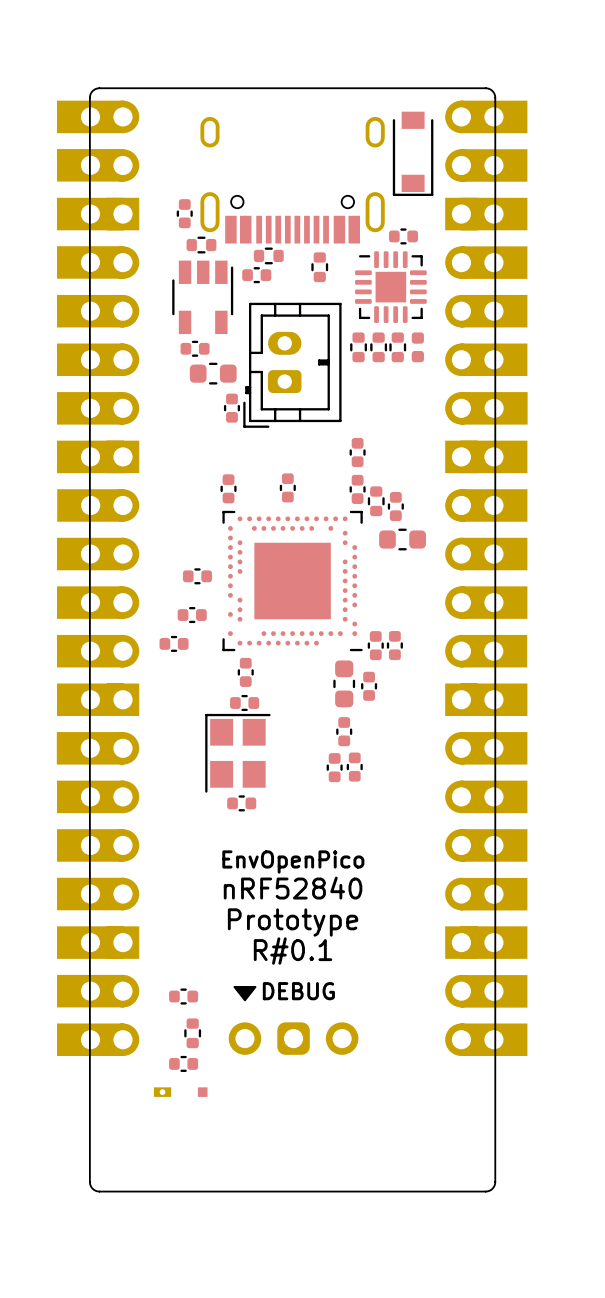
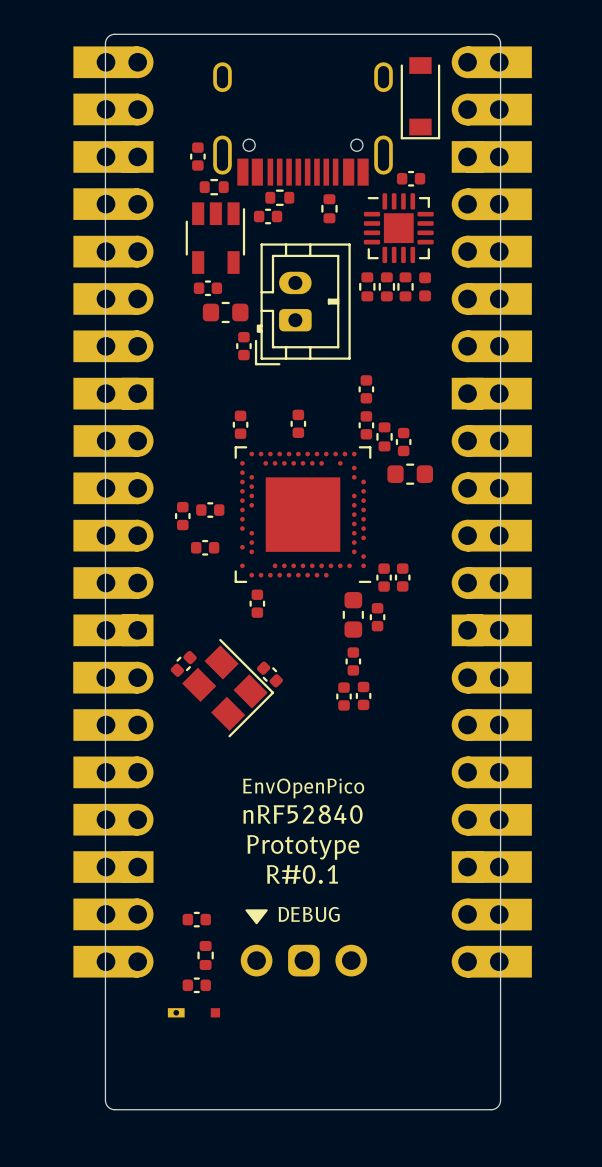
part rotation: 0° (174, 643) -> 90° clockwise (182, 516)
part position: (174, 643) -> (182, 516)
part: (244, 703) -> none
part: none -> (183, 663)
part: none -> (269, 674)
part: (237, 753) -> none
part: none -> (228, 688)
part: (241, 803) -> none

